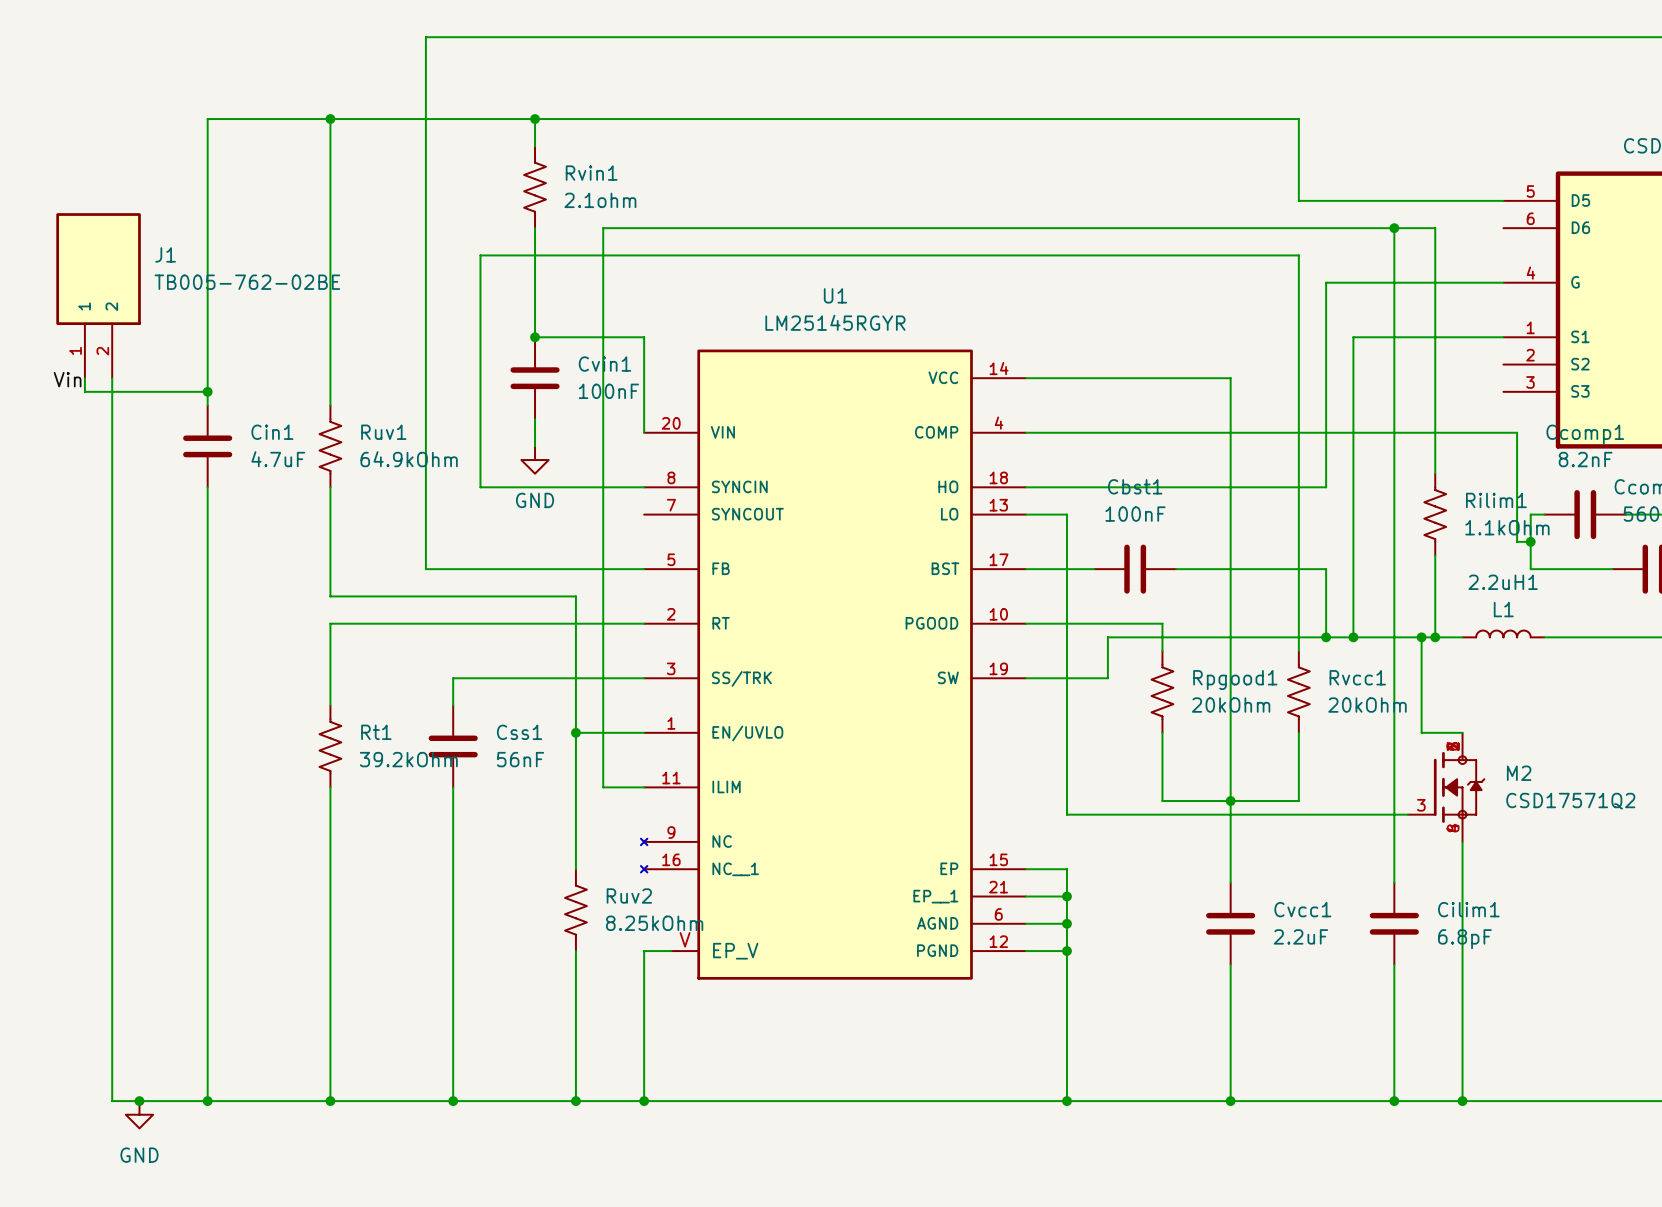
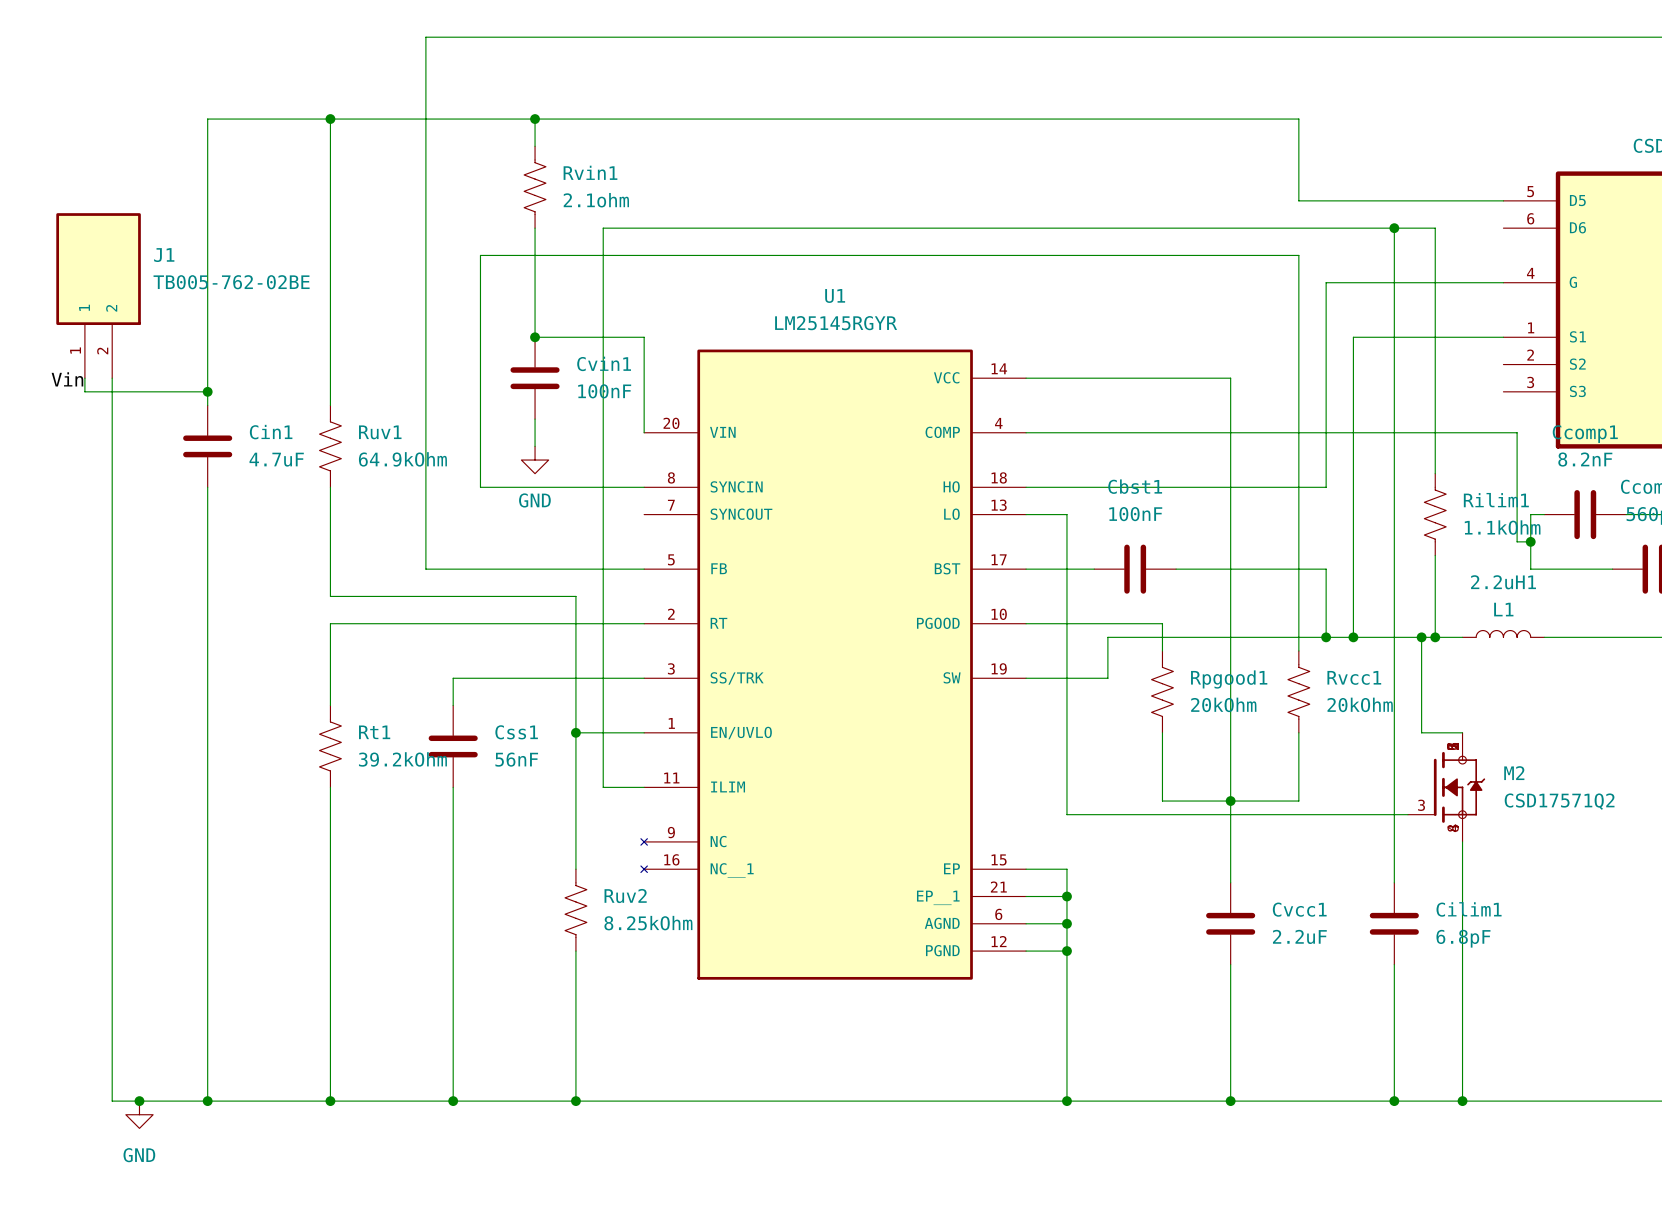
U1 symbol: [640, 349, 1027, 980] -> [640, 349, 1027, 980]
wire: (671, 951) (644, 951) (644, 1101) -> none
junction: (644, 1101) -> none

